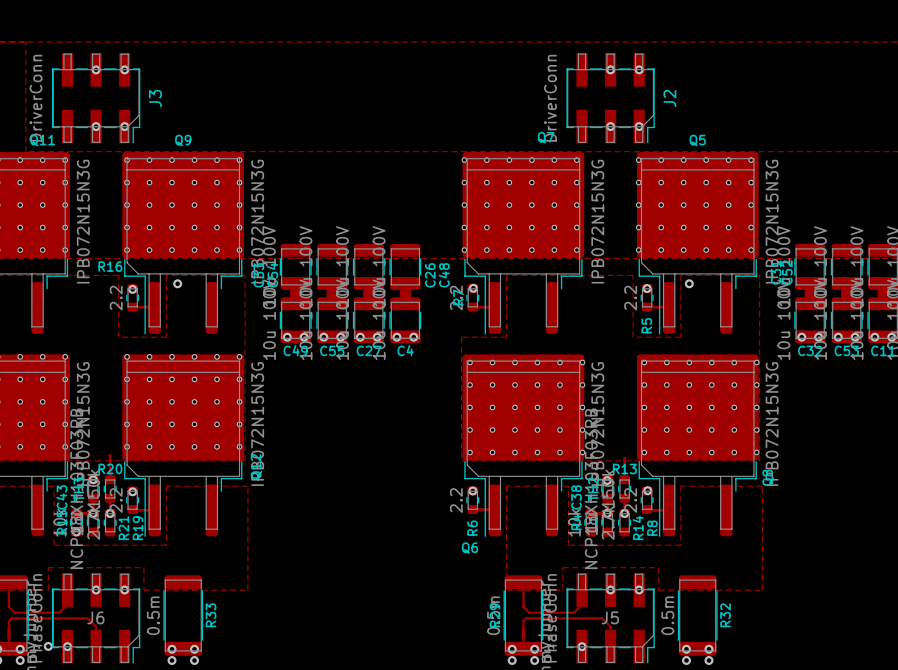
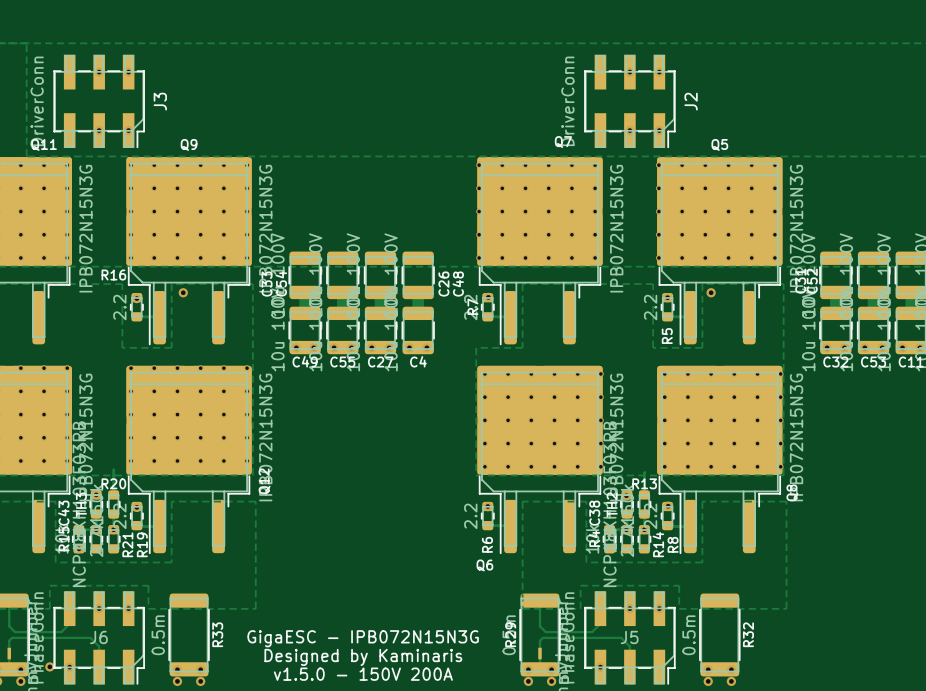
text: none -> GigaESC - IPB072N15N3G (363, 638)
text: none -> Designed by Kaminaris (363, 657)
text: none -> v1.5.0 - 150V 200A (363, 674)

